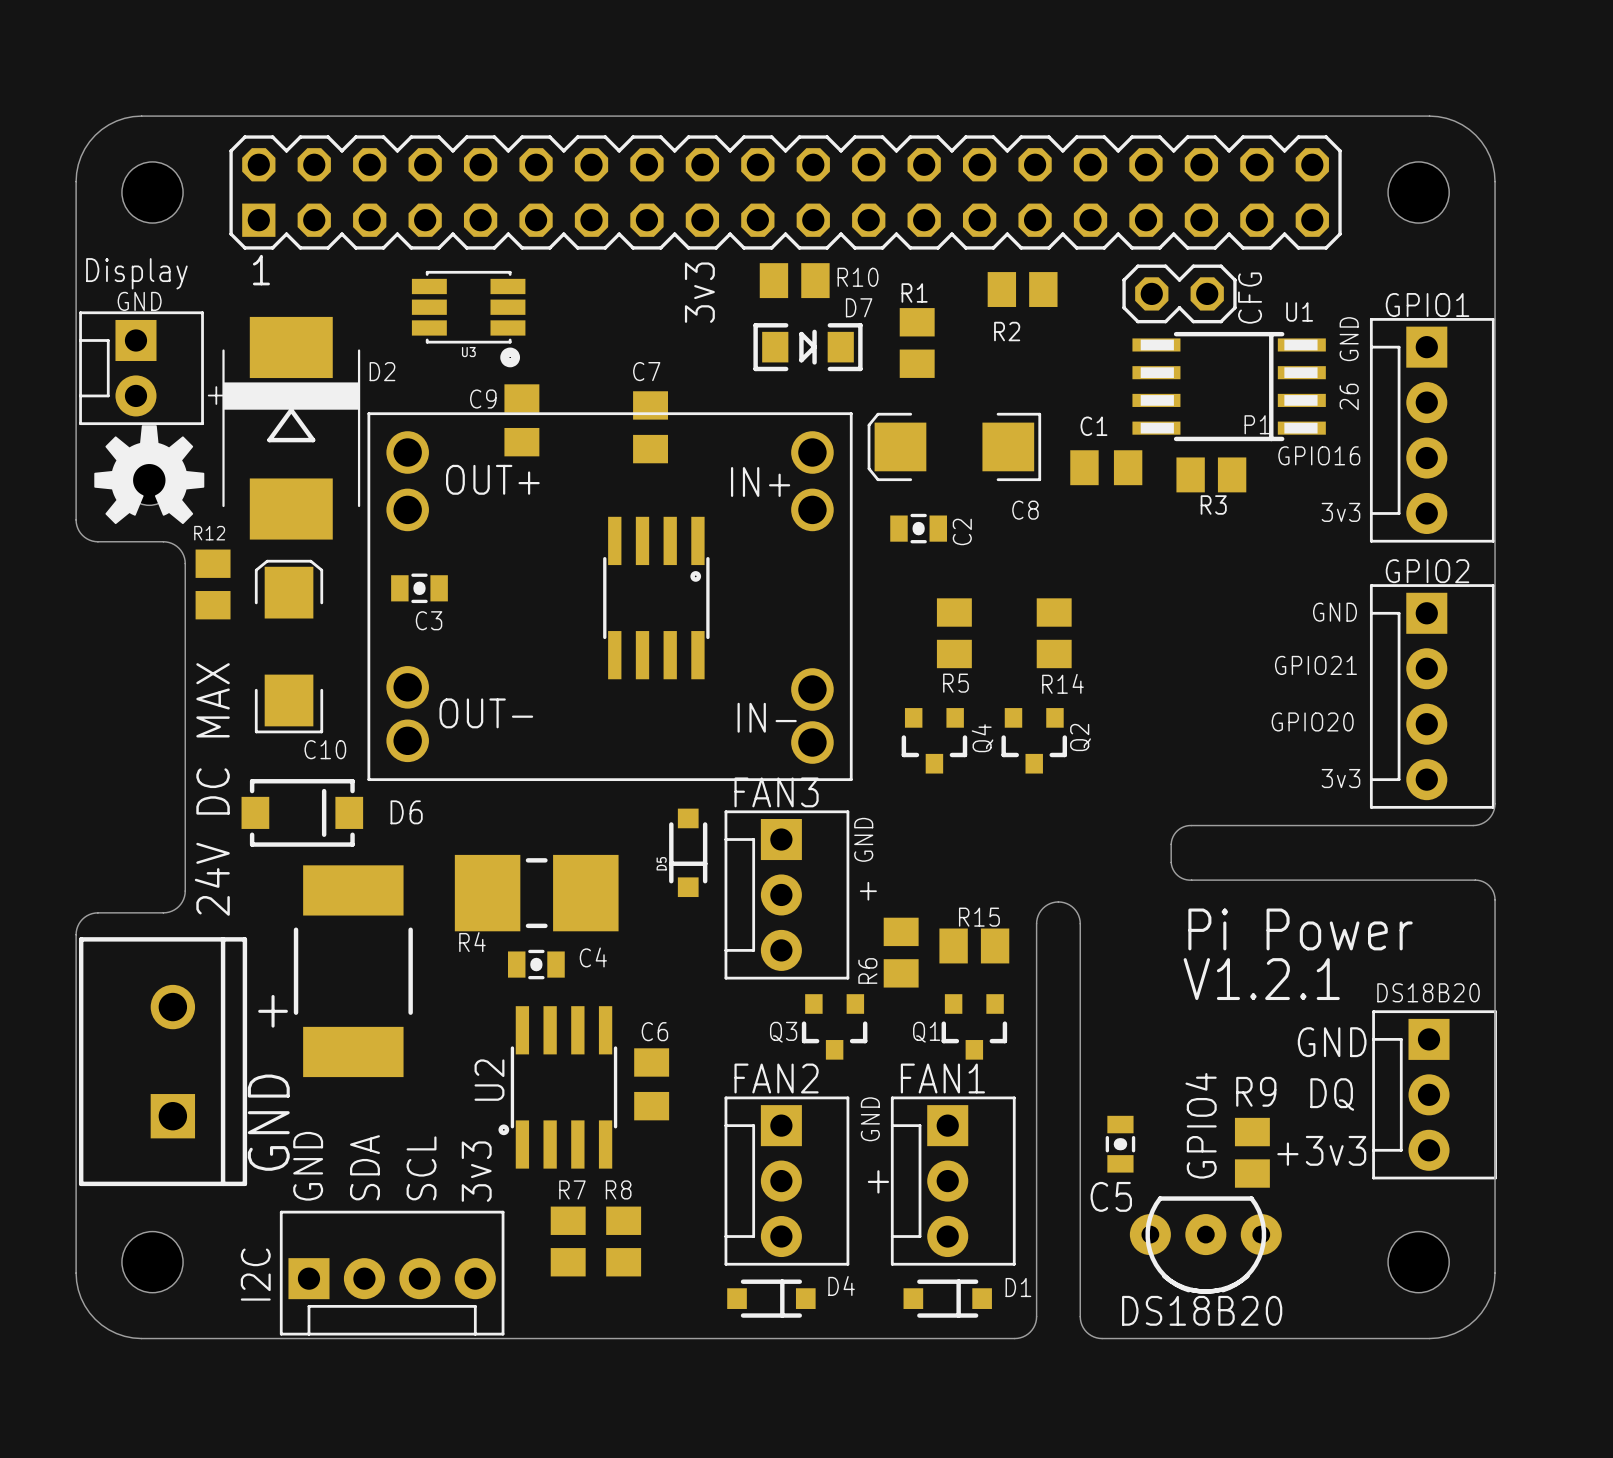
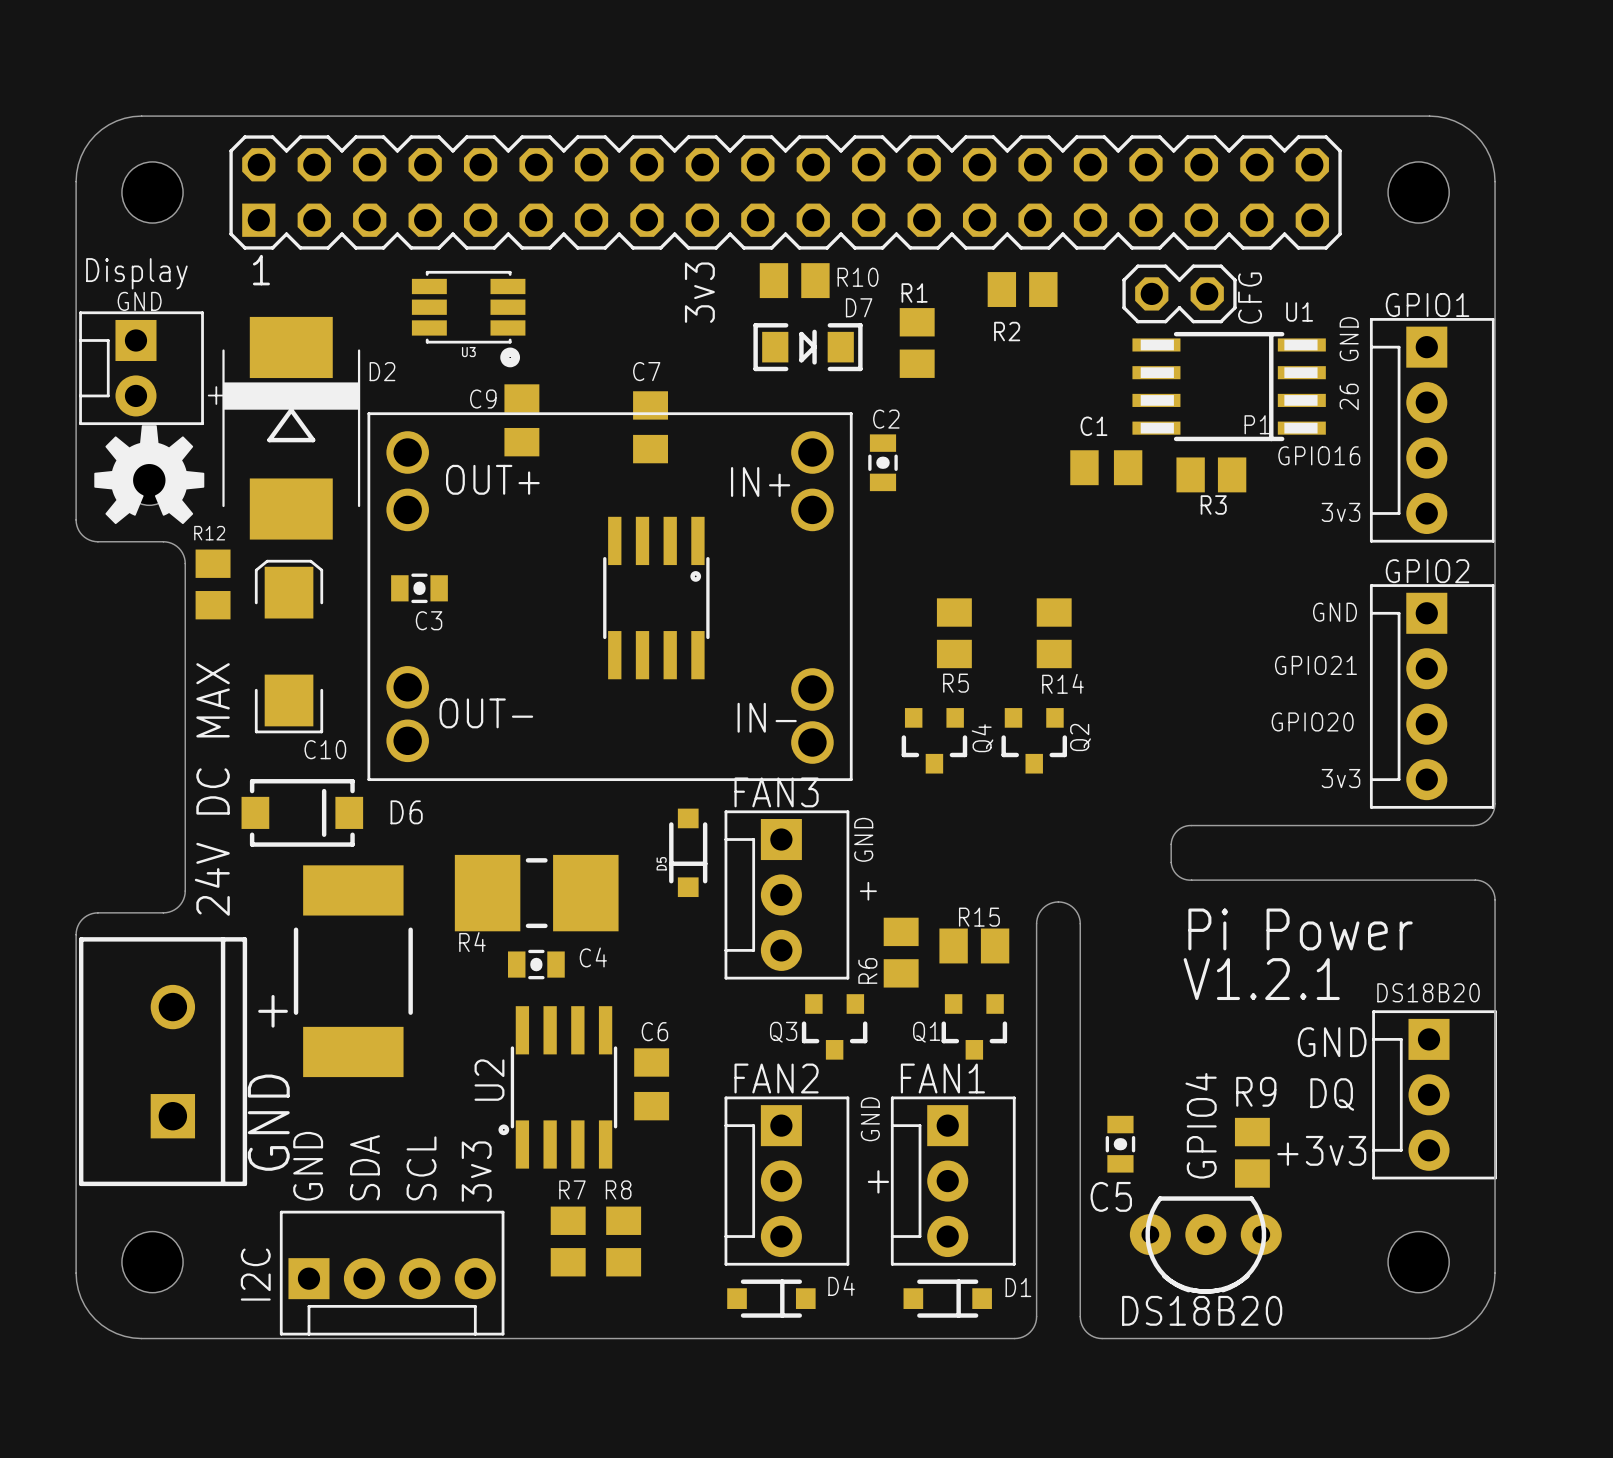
C8: (954, 446) -> none
C2 rotation: 0° (918, 528) -> 90° clockwise (882, 462)
C2 position: (918, 528) -> (882, 462)
C2 name position: C2 (962, 531) -> C2 (886, 419)

